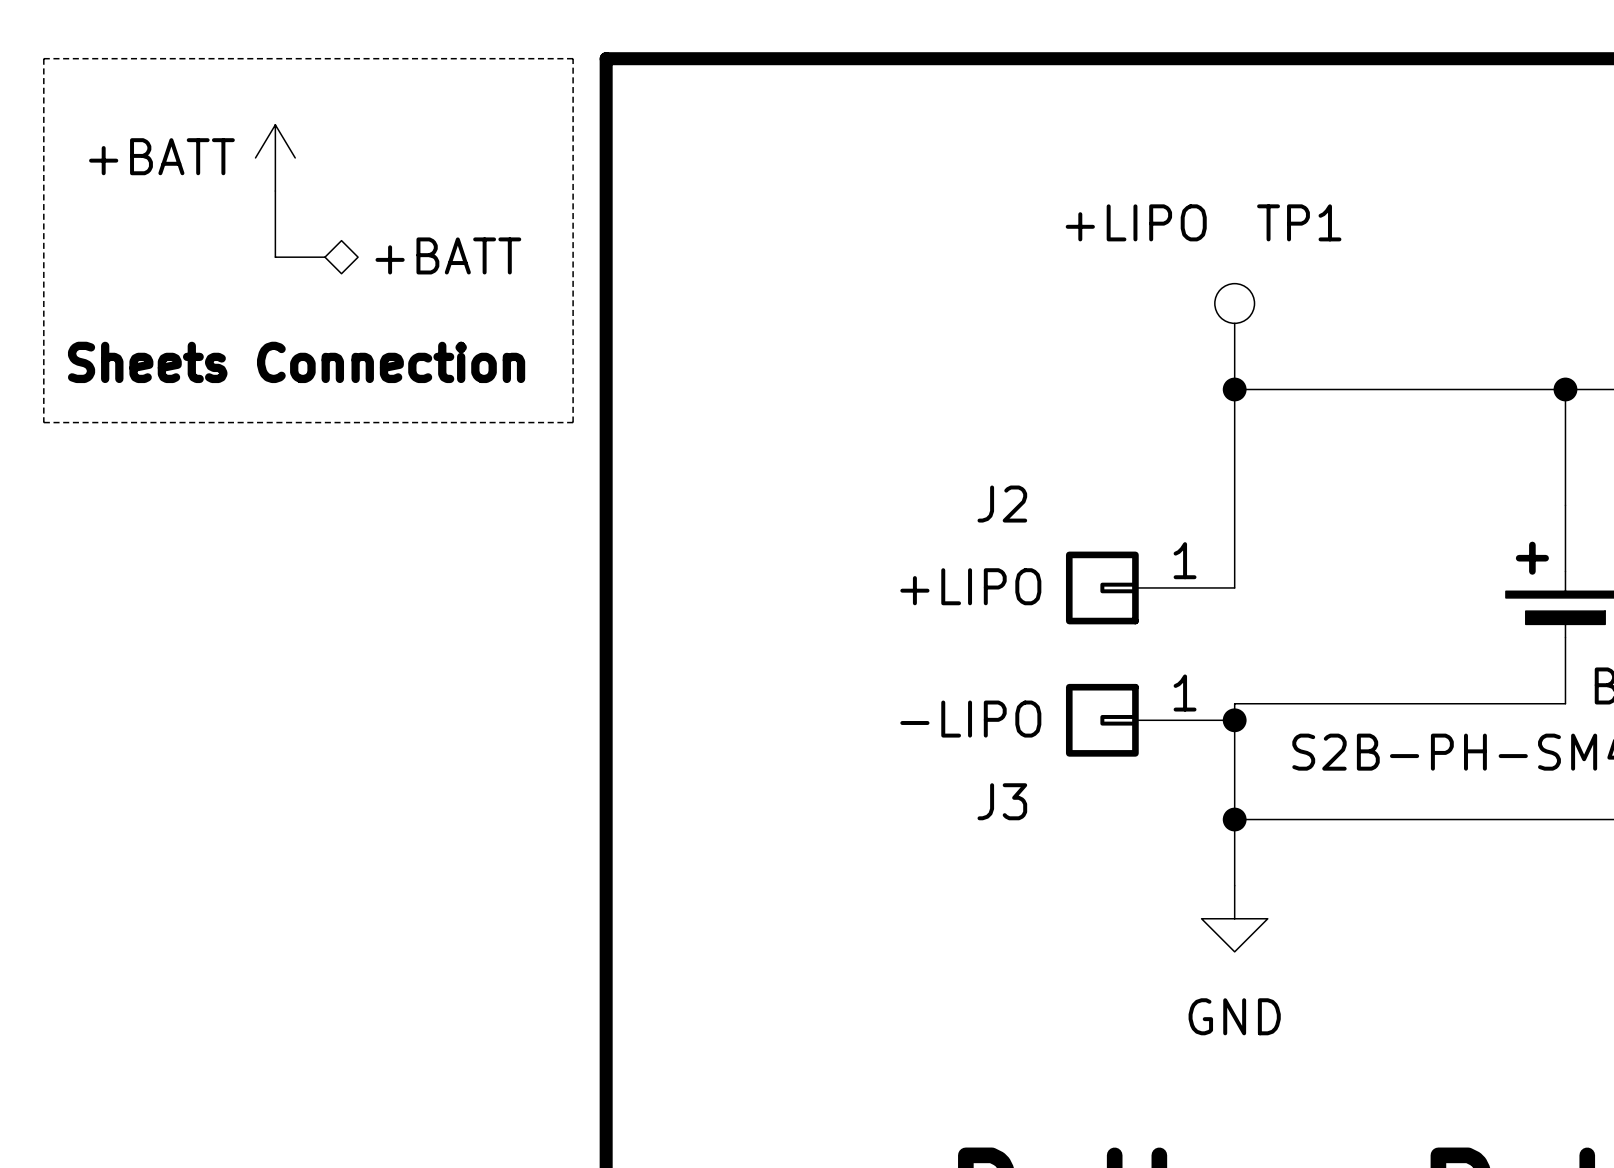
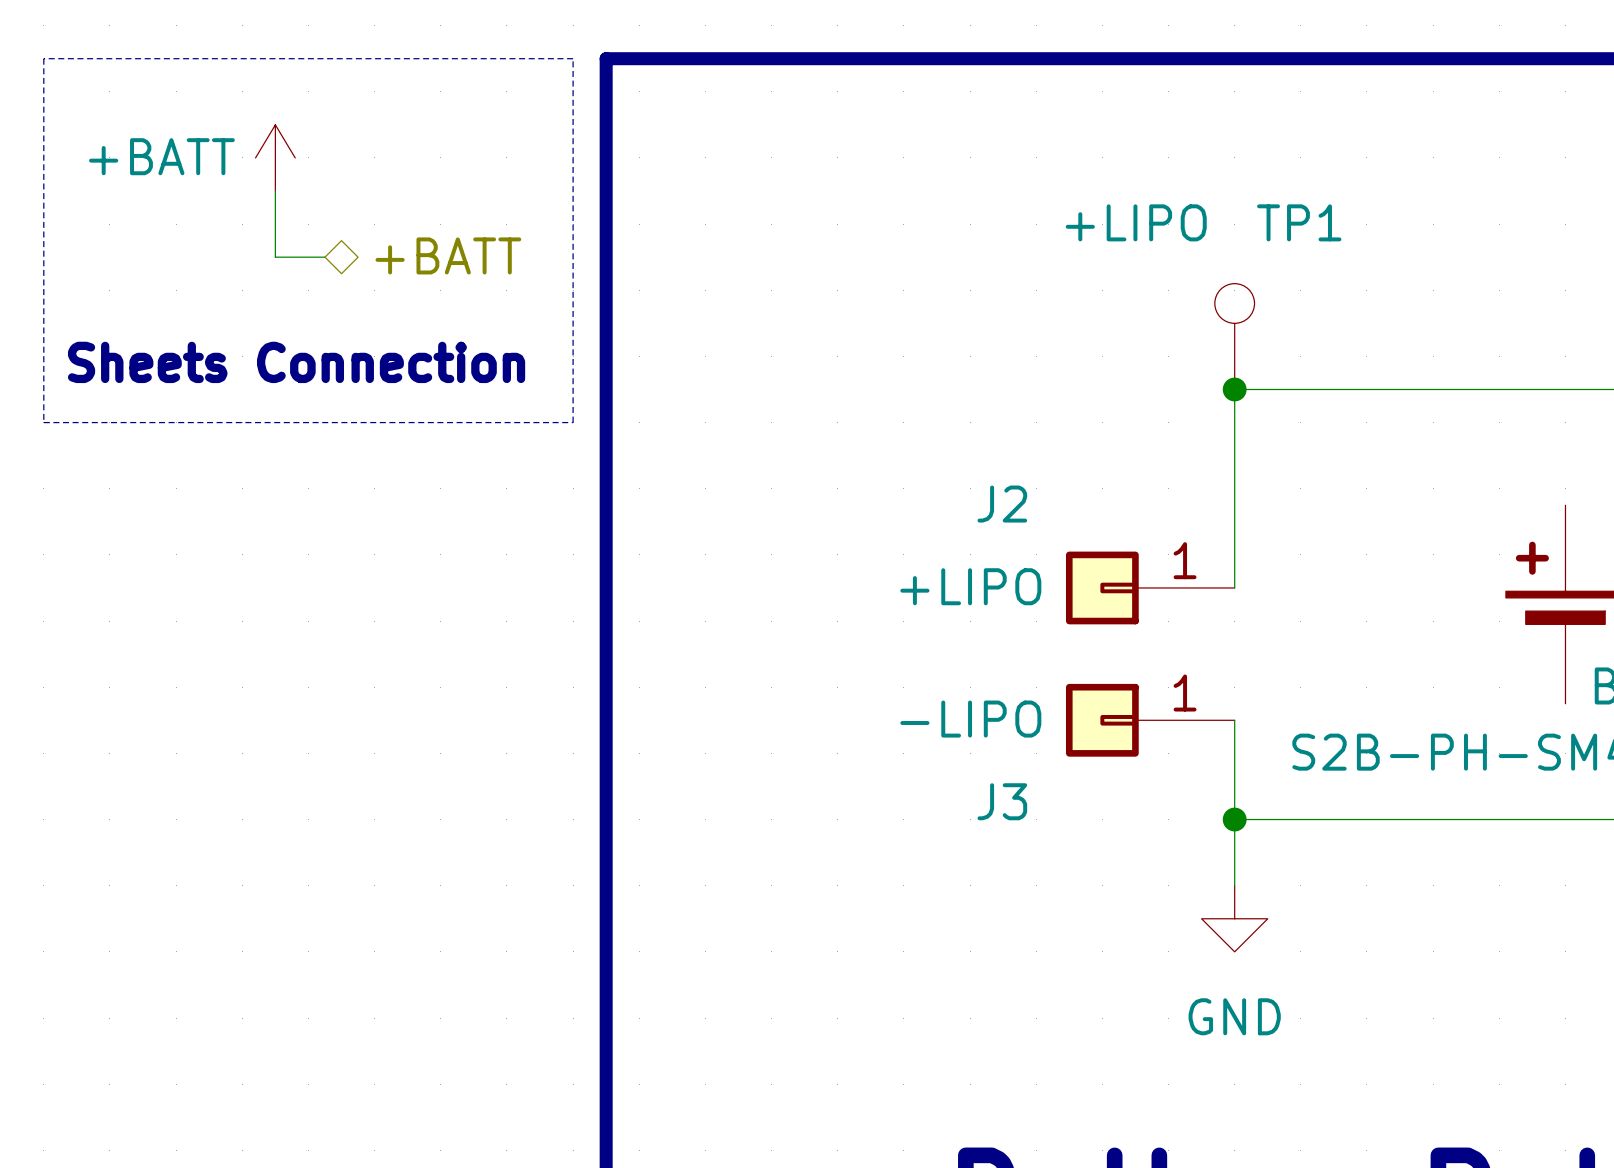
wire: (1565, 389) (1565, 505) -> none
junction: (1565, 389) -> none
wire: (1565, 703) (1234, 703) (1234, 720) -> none
junction: (1234, 720) -> none

